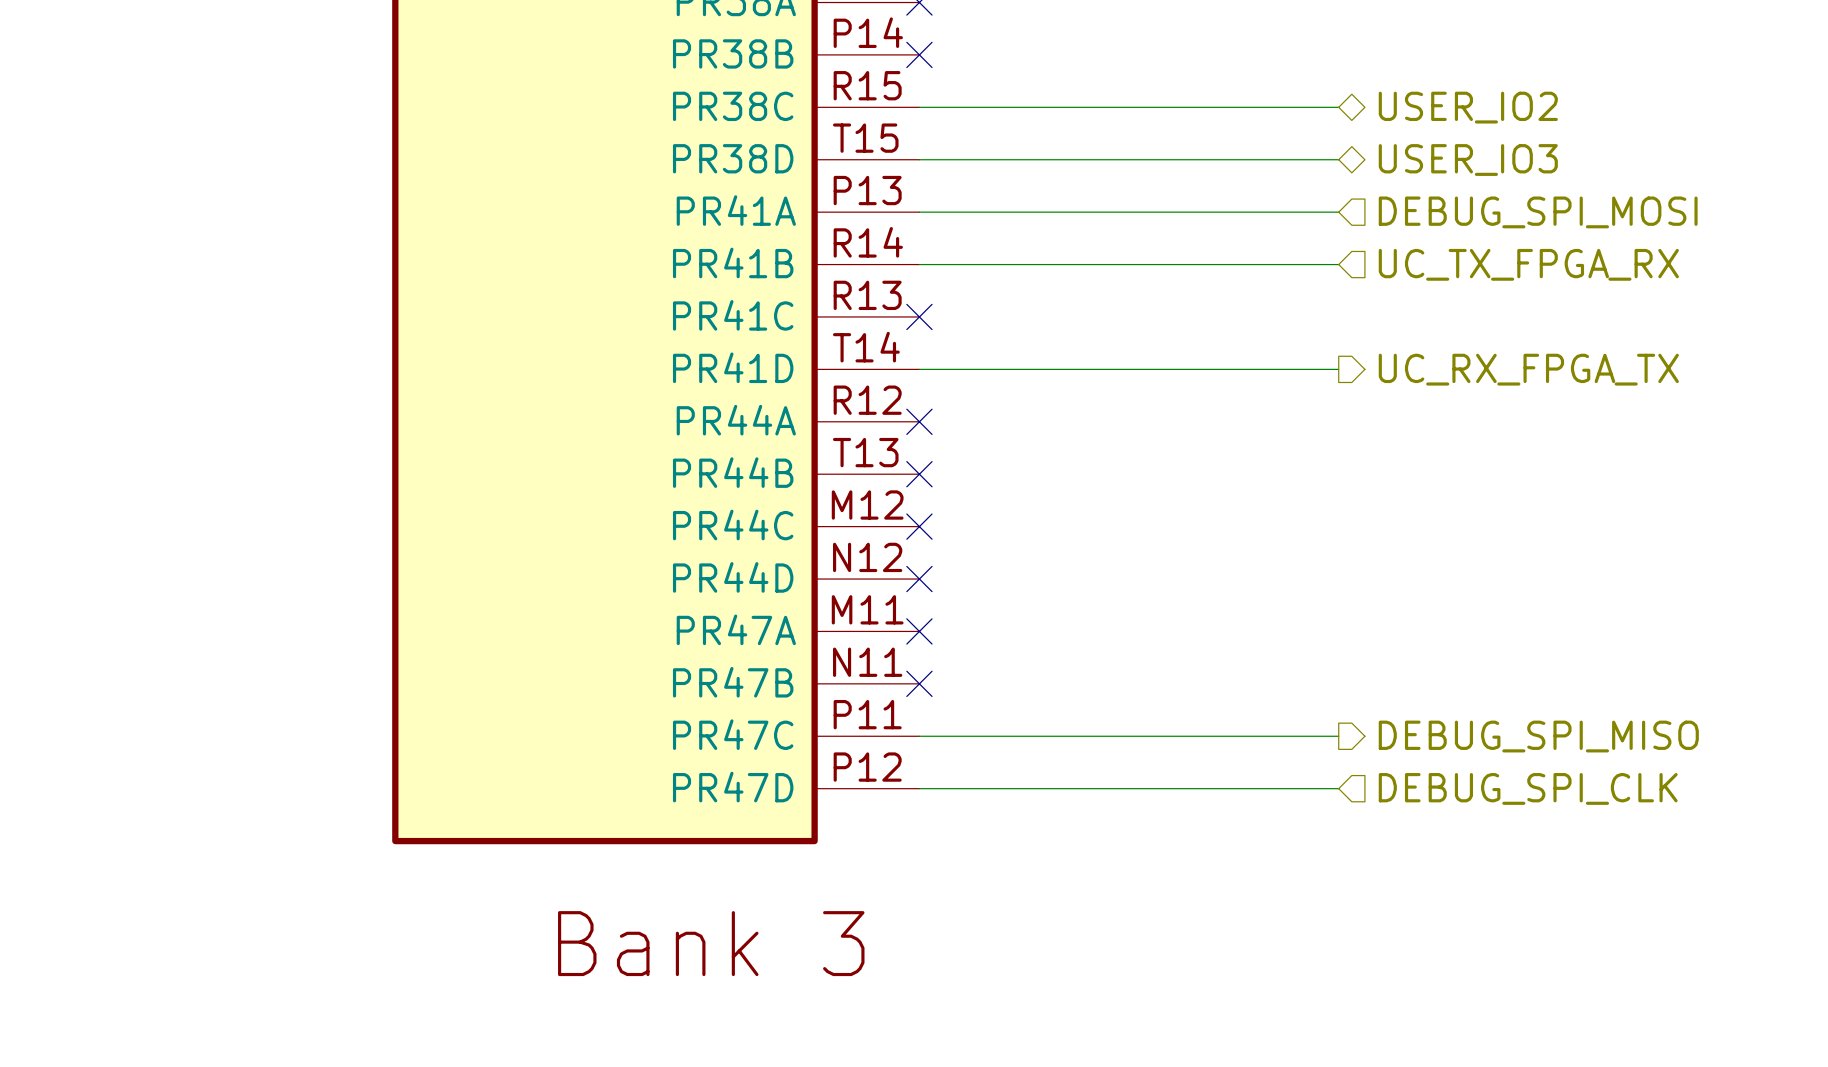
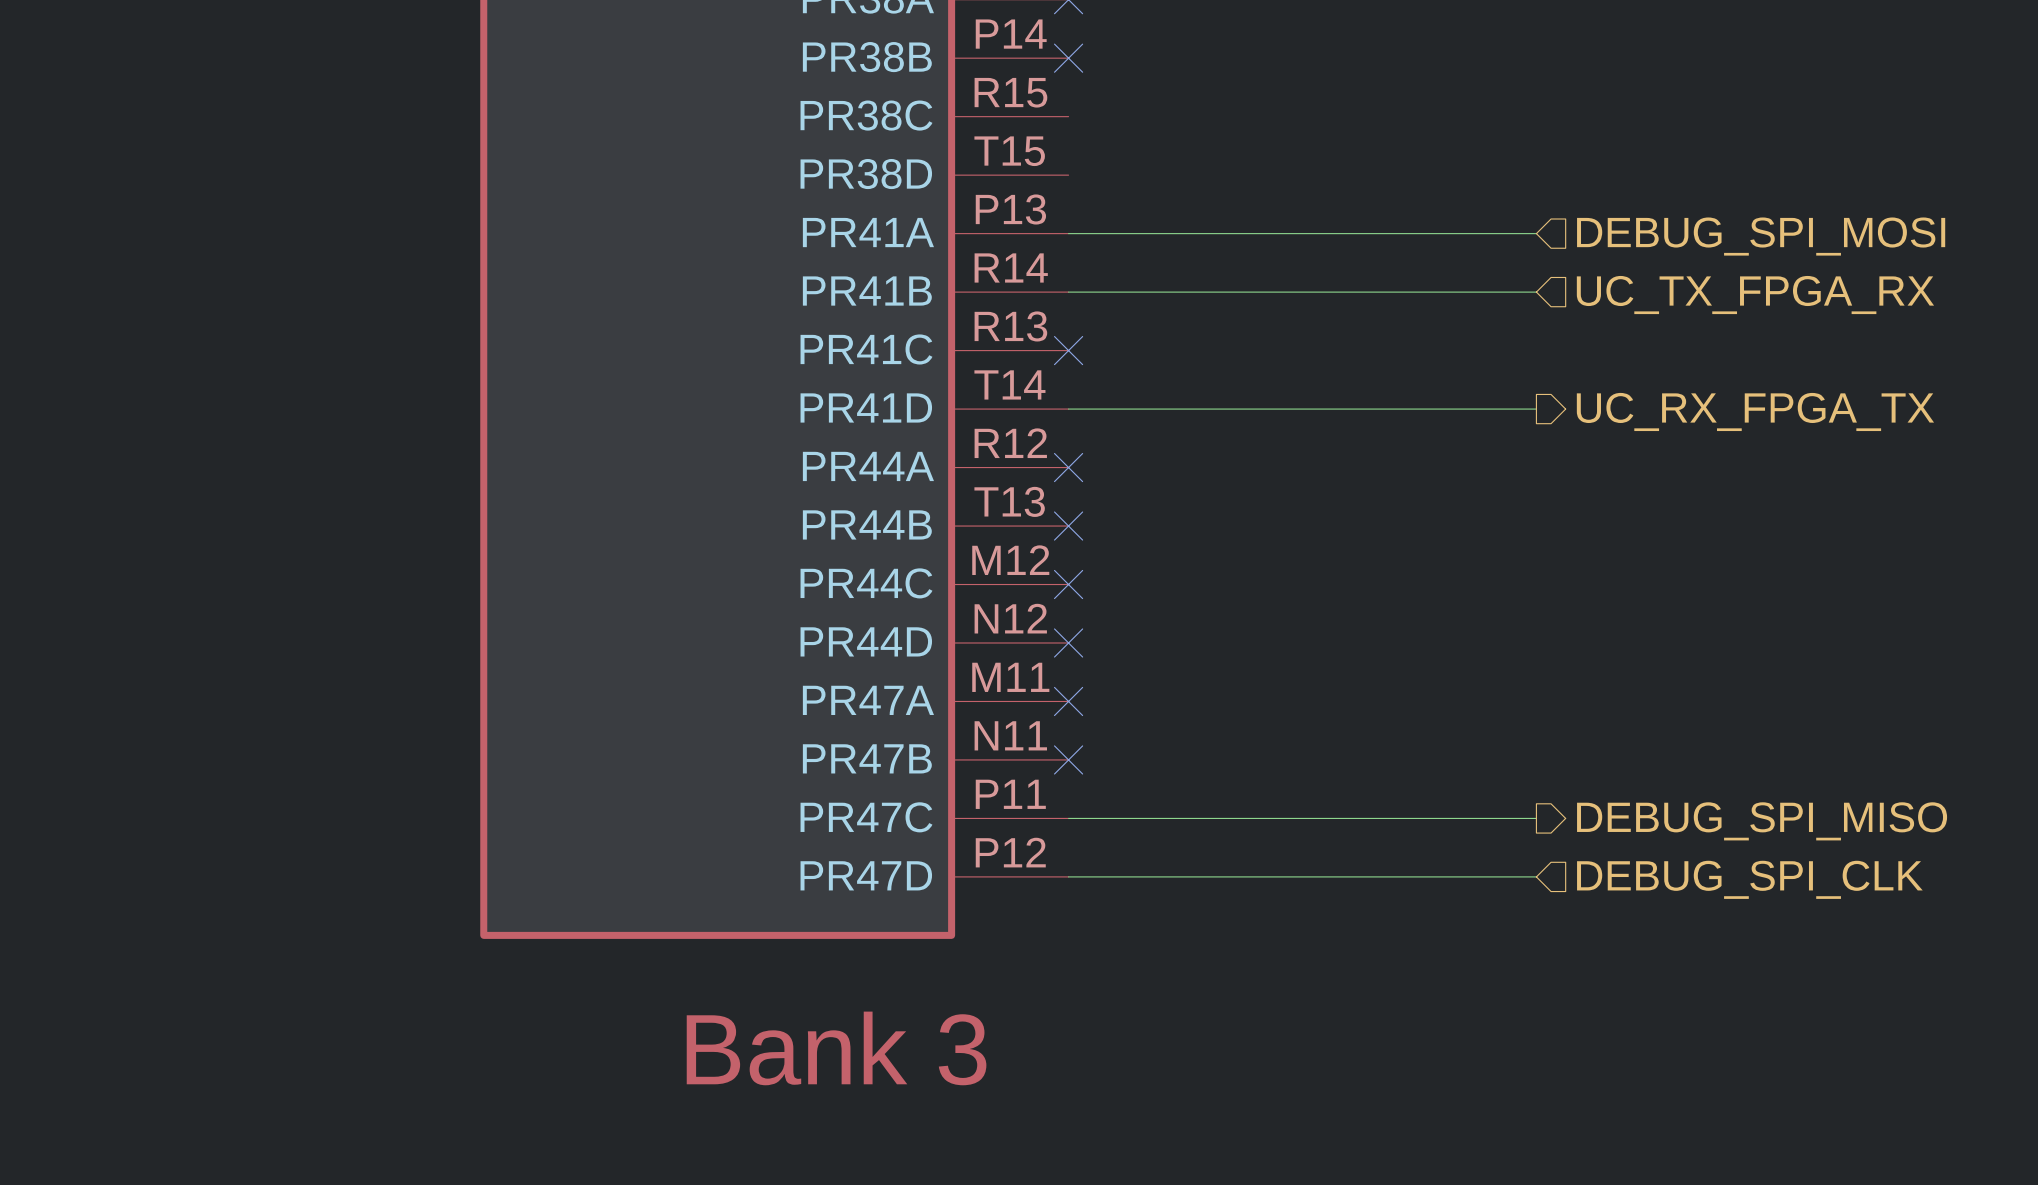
wire: (919, 107) (1338, 107) -> none
hierarchical label: USER_IO2 (1468, 107) -> none
wire: (919, 159) (1338, 159) -> none
hierarchical label: USER_IO3 (1468, 160) -> none

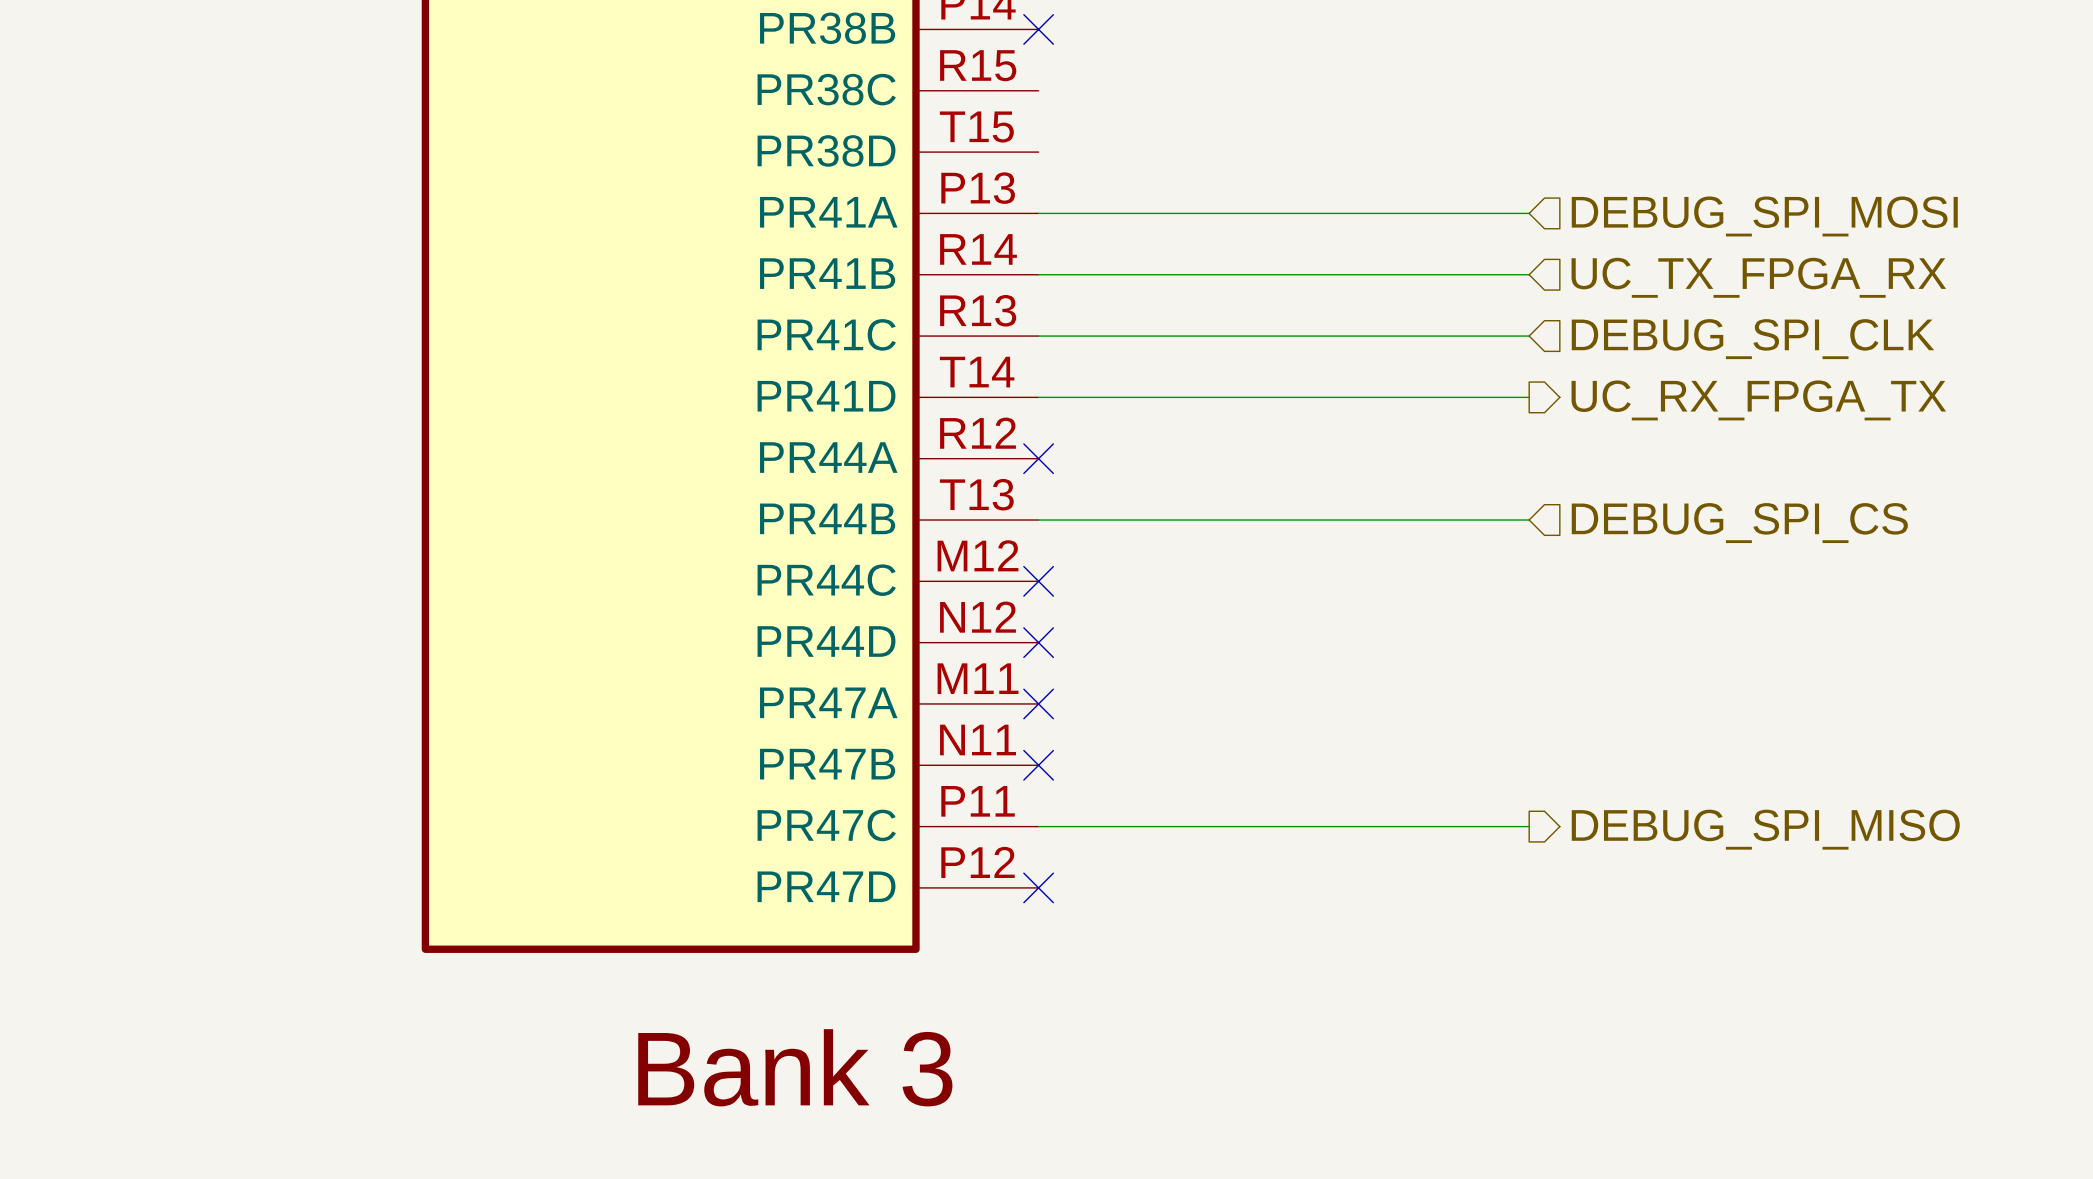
wire: none -> (1038, 336) (1529, 336)
no-connect mark: (1068, 350) -> none
no-connect mark: (1068, 526) -> none
hierarchical label: none -> DEBUG_SPI_CS (1739, 523)
wire: (1068, 876) (1536, 876) -> (1038, 520) (1529, 520)
no-connect mark: none -> (1038, 887)
hierarchical label position: DEBUG_SPI_CLK (1749, 879) -> DEBUG_SPI_CLK (1752, 339)

